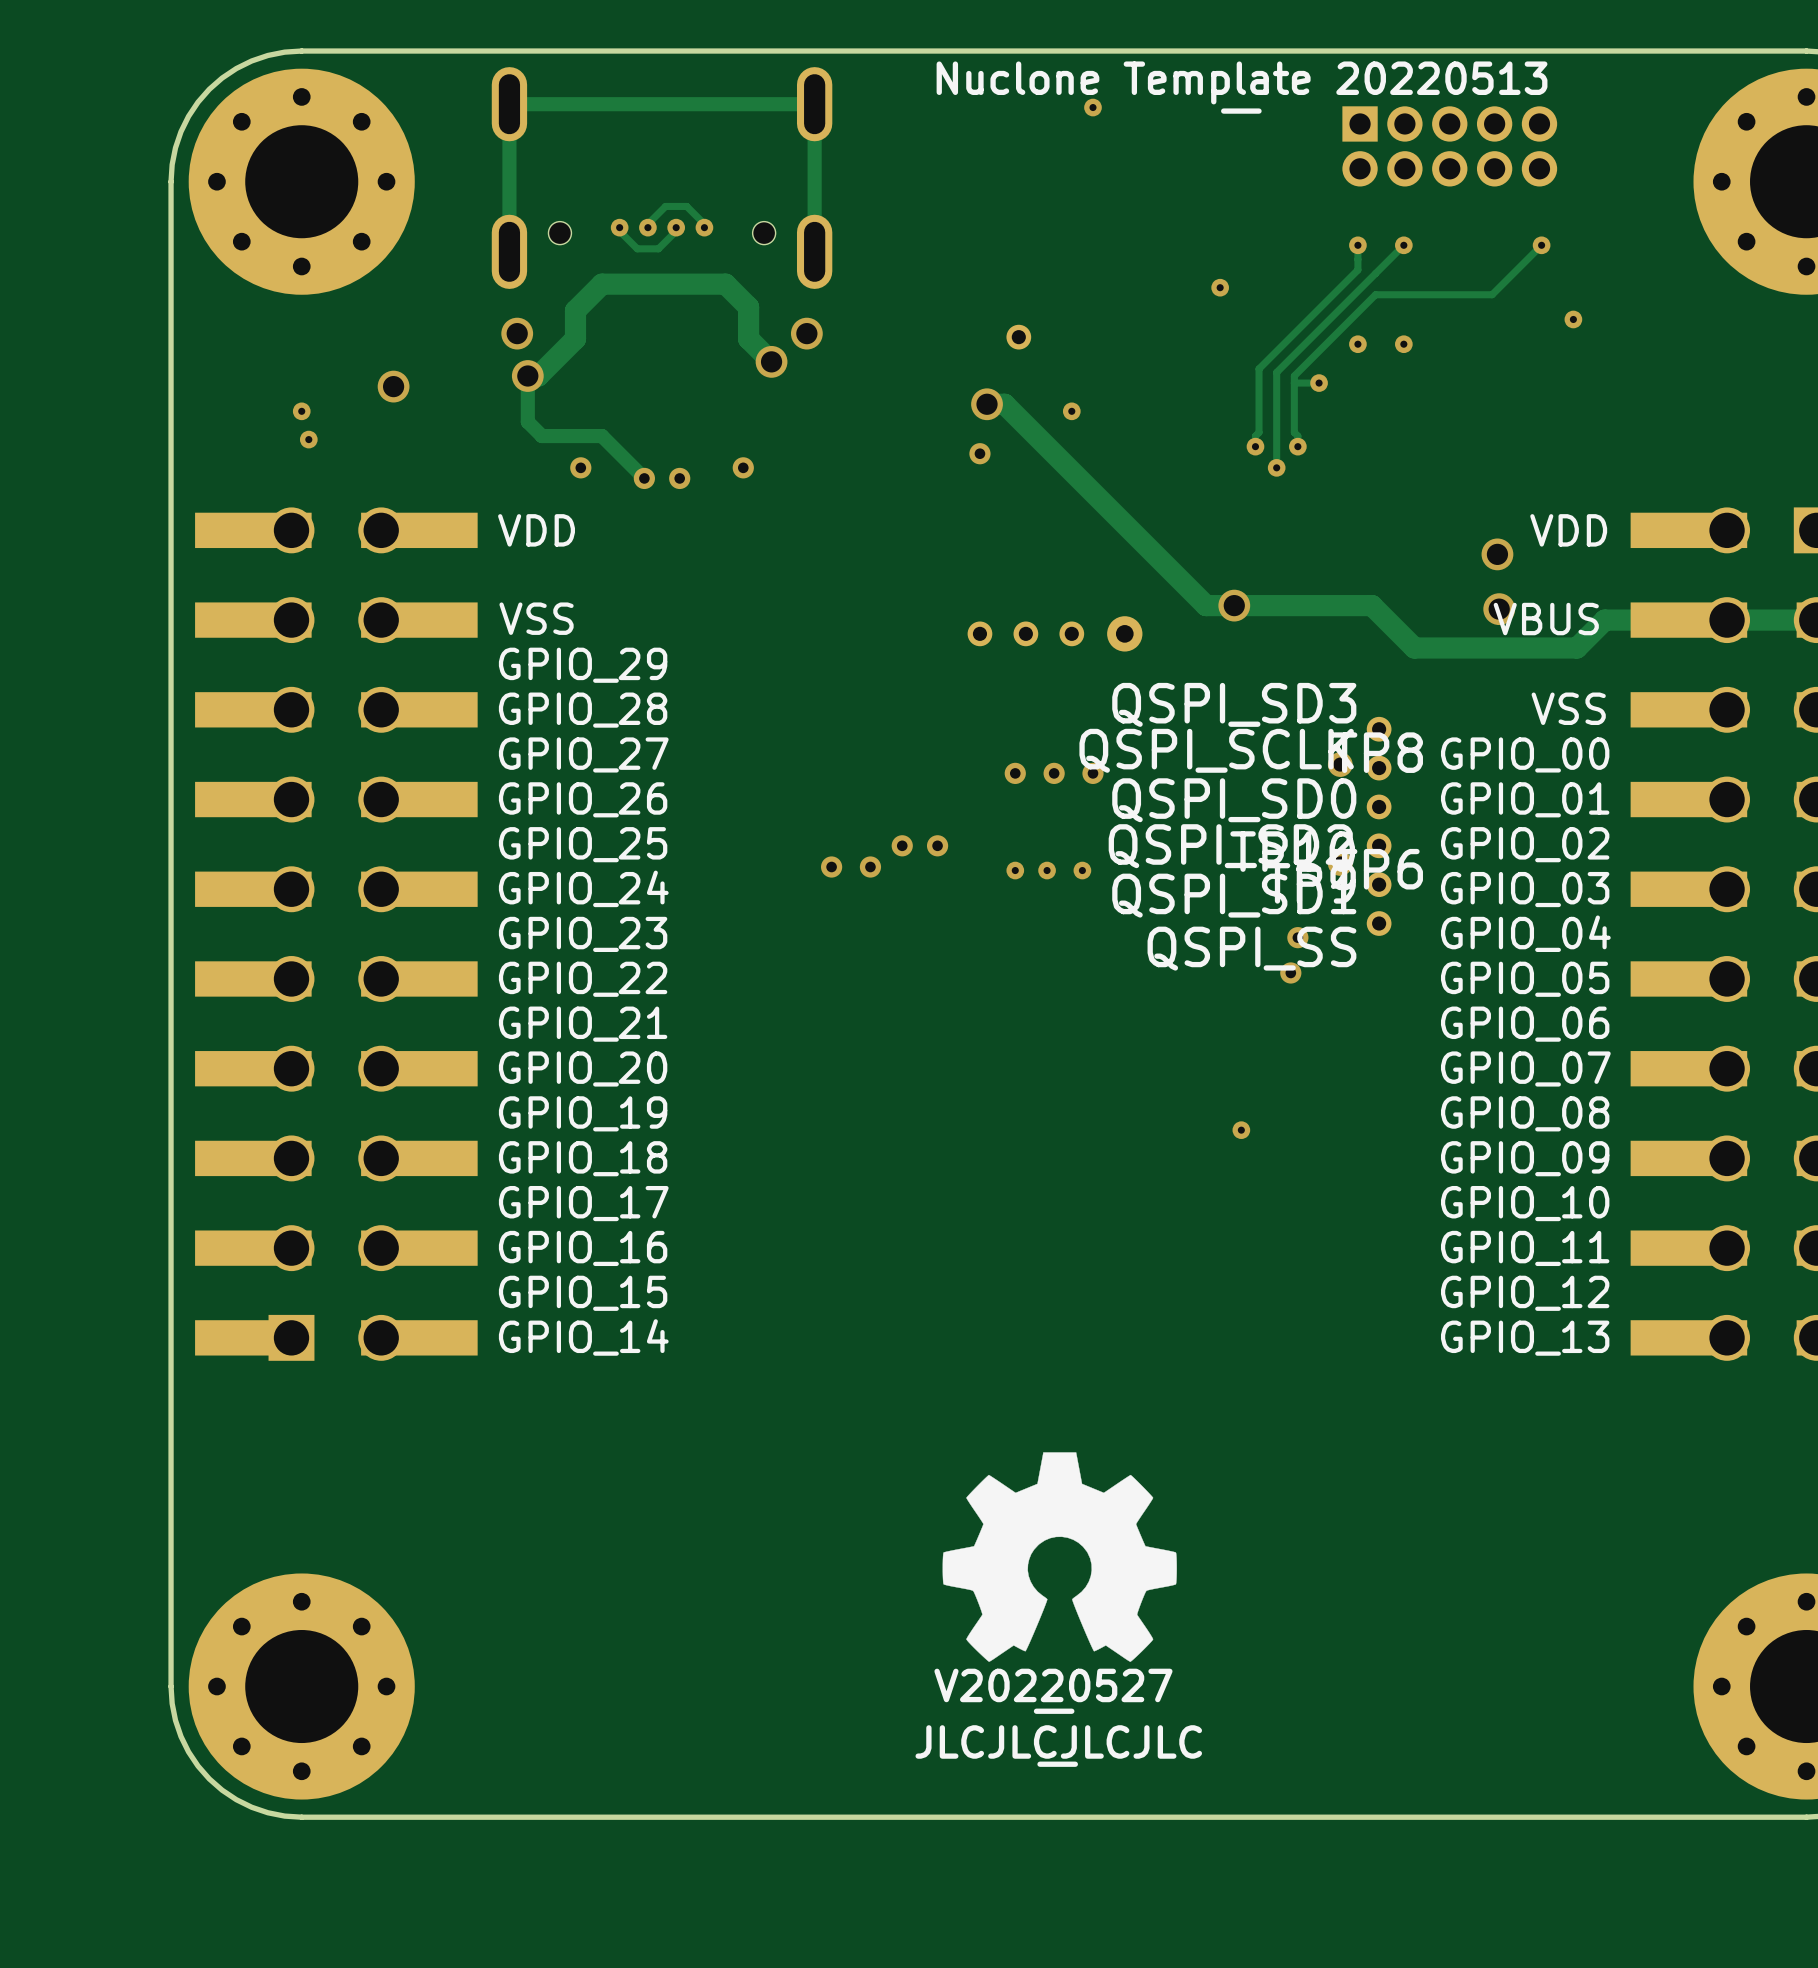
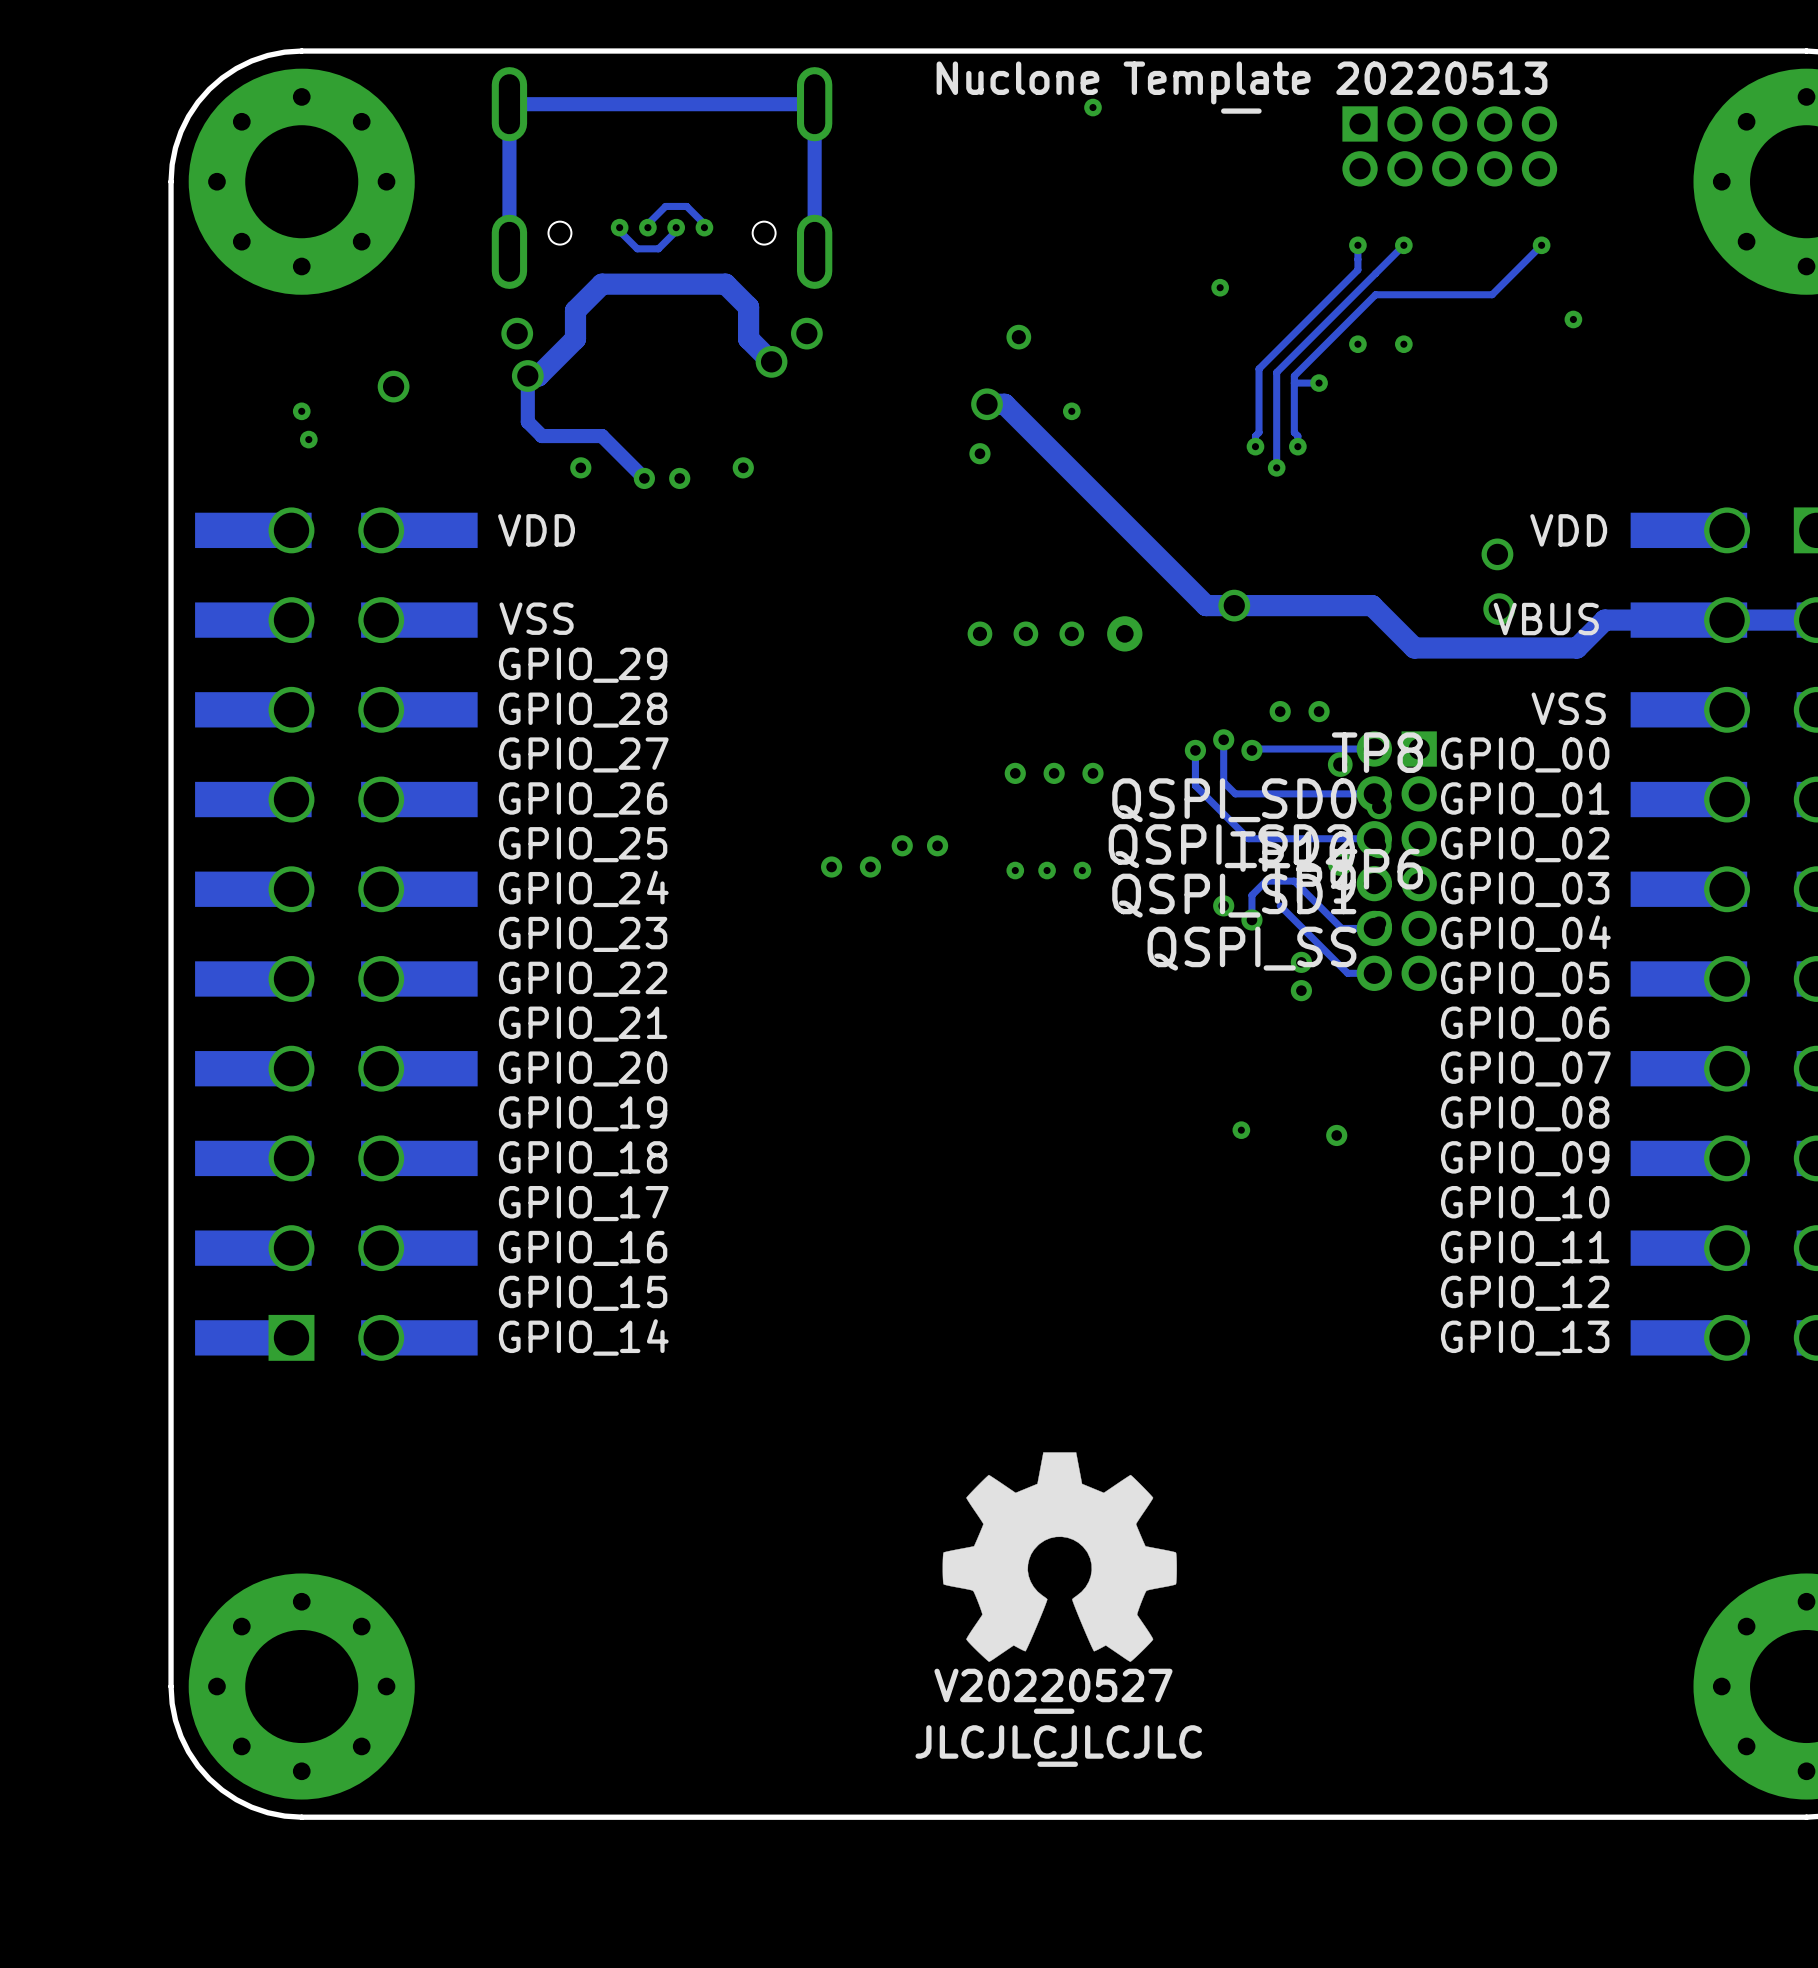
via: none -> (1280, 711)
via: none -> (1319, 711)
part: QSPI_SD3 (1379, 729) -> none
track: none -> (1223, 739) (1223, 782) (1235, 793) (1374, 793)
via: none -> (1223, 739)
track: none -> (1374, 749) (1251, 750)
track: none -> (1195, 750) (1195, 785) (1248, 838) (1374, 838)
via: none -> (1195, 750)
via: none -> (1251, 750)
part: QSPI_SCLK (1379, 768) -> none
part: none -> (1396, 861)
via: none -> (1223, 905)
track: none -> (1280, 905) (1347, 973) (1374, 973)
track: none -> (1251, 919) (1251, 895) (1266, 881) (1294, 881) (1341, 928) (1374, 928)
via: none -> (1251, 919)
via: (1297, 937) -> none
via: none -> (1301, 962)
via: (1290, 972) -> none
via: none -> (1301, 990)
via: none -> (1336, 1135)

